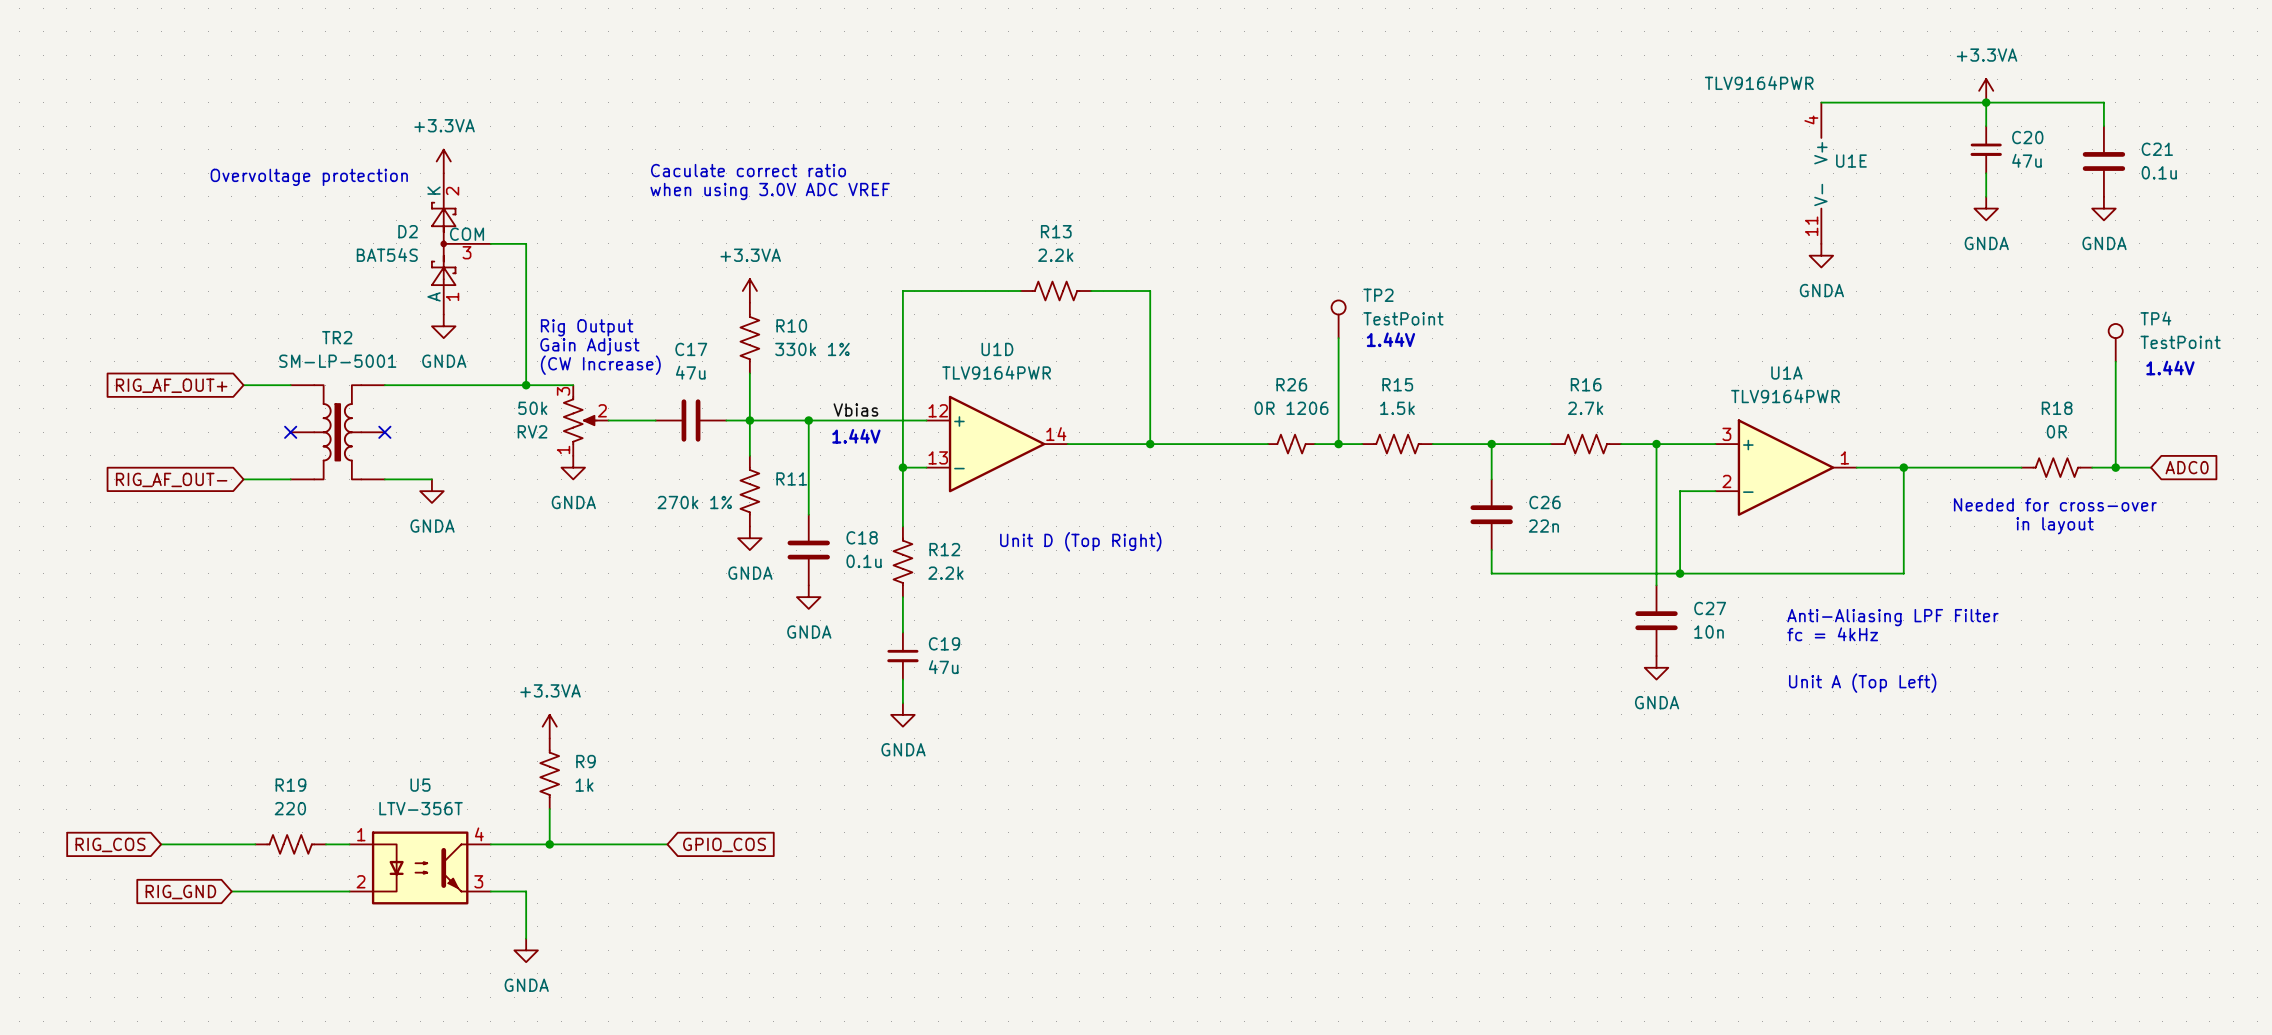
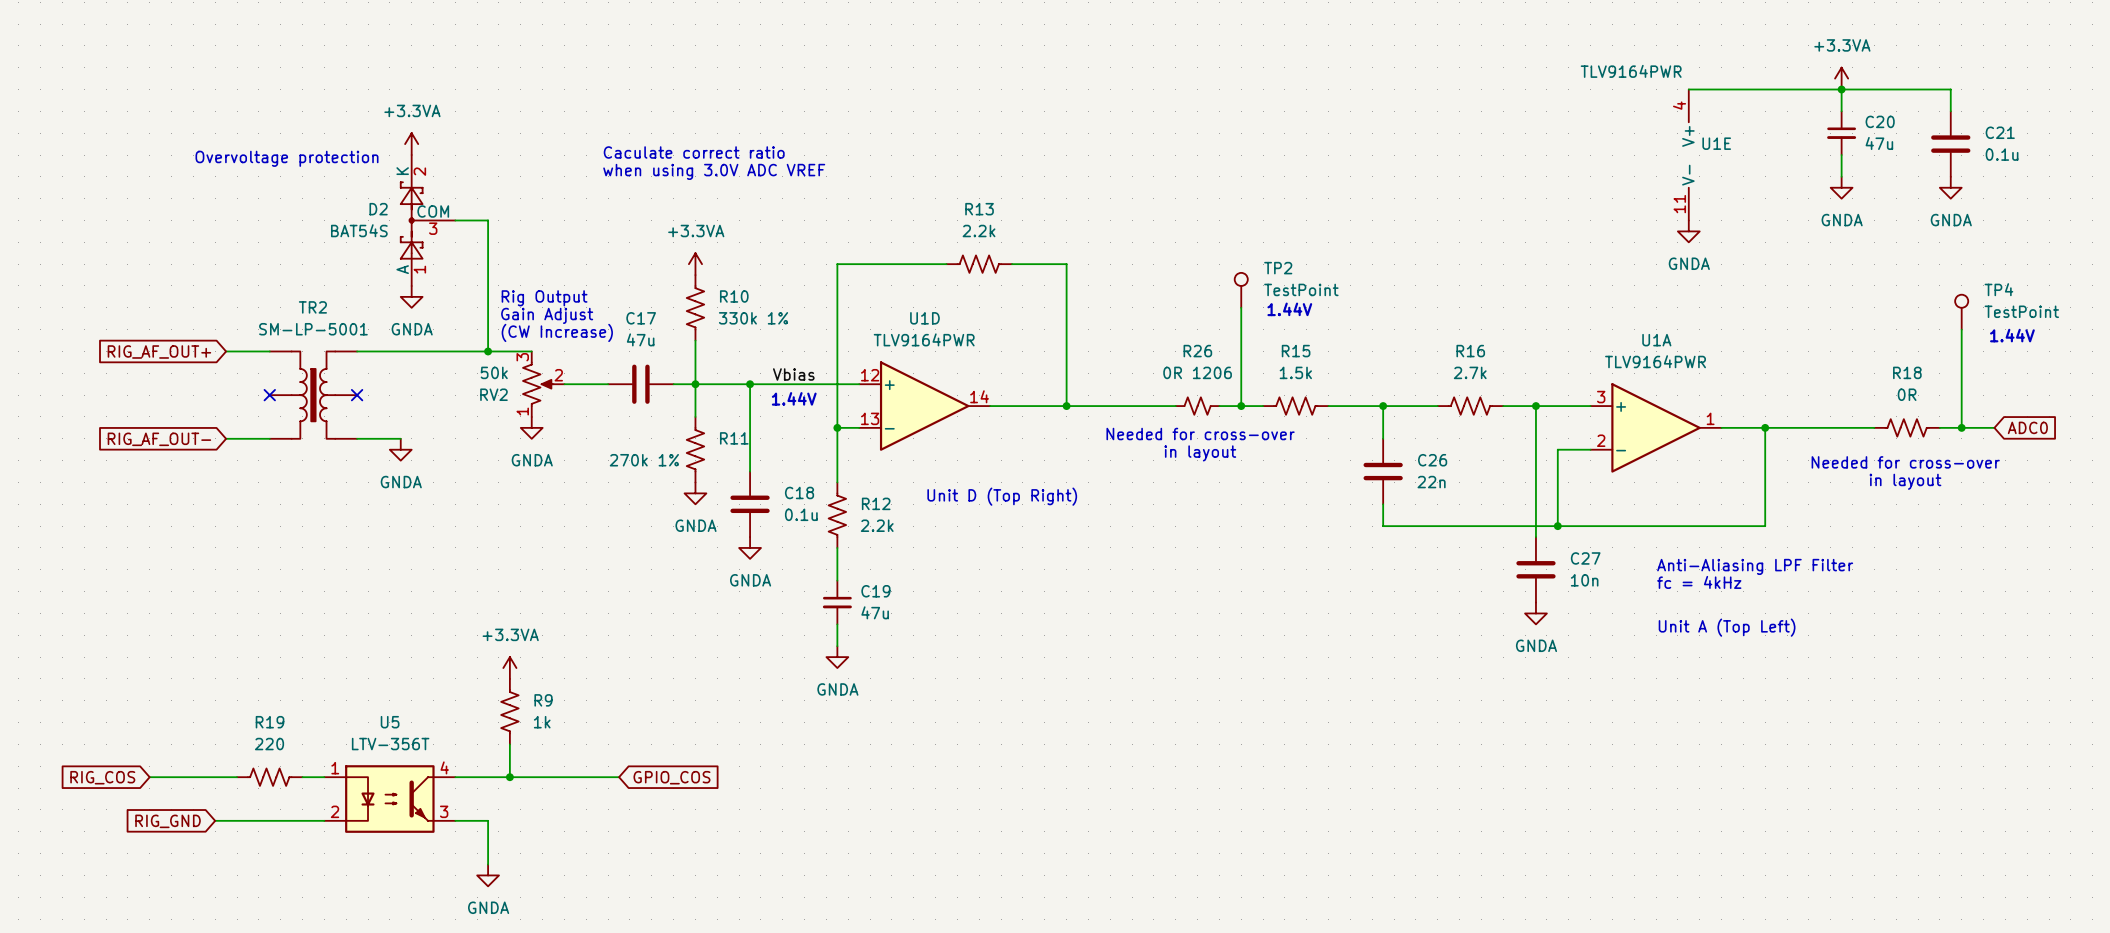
text: none -> Needed for cross-over (1200, 434)
text: none -> in layout (1200, 453)

